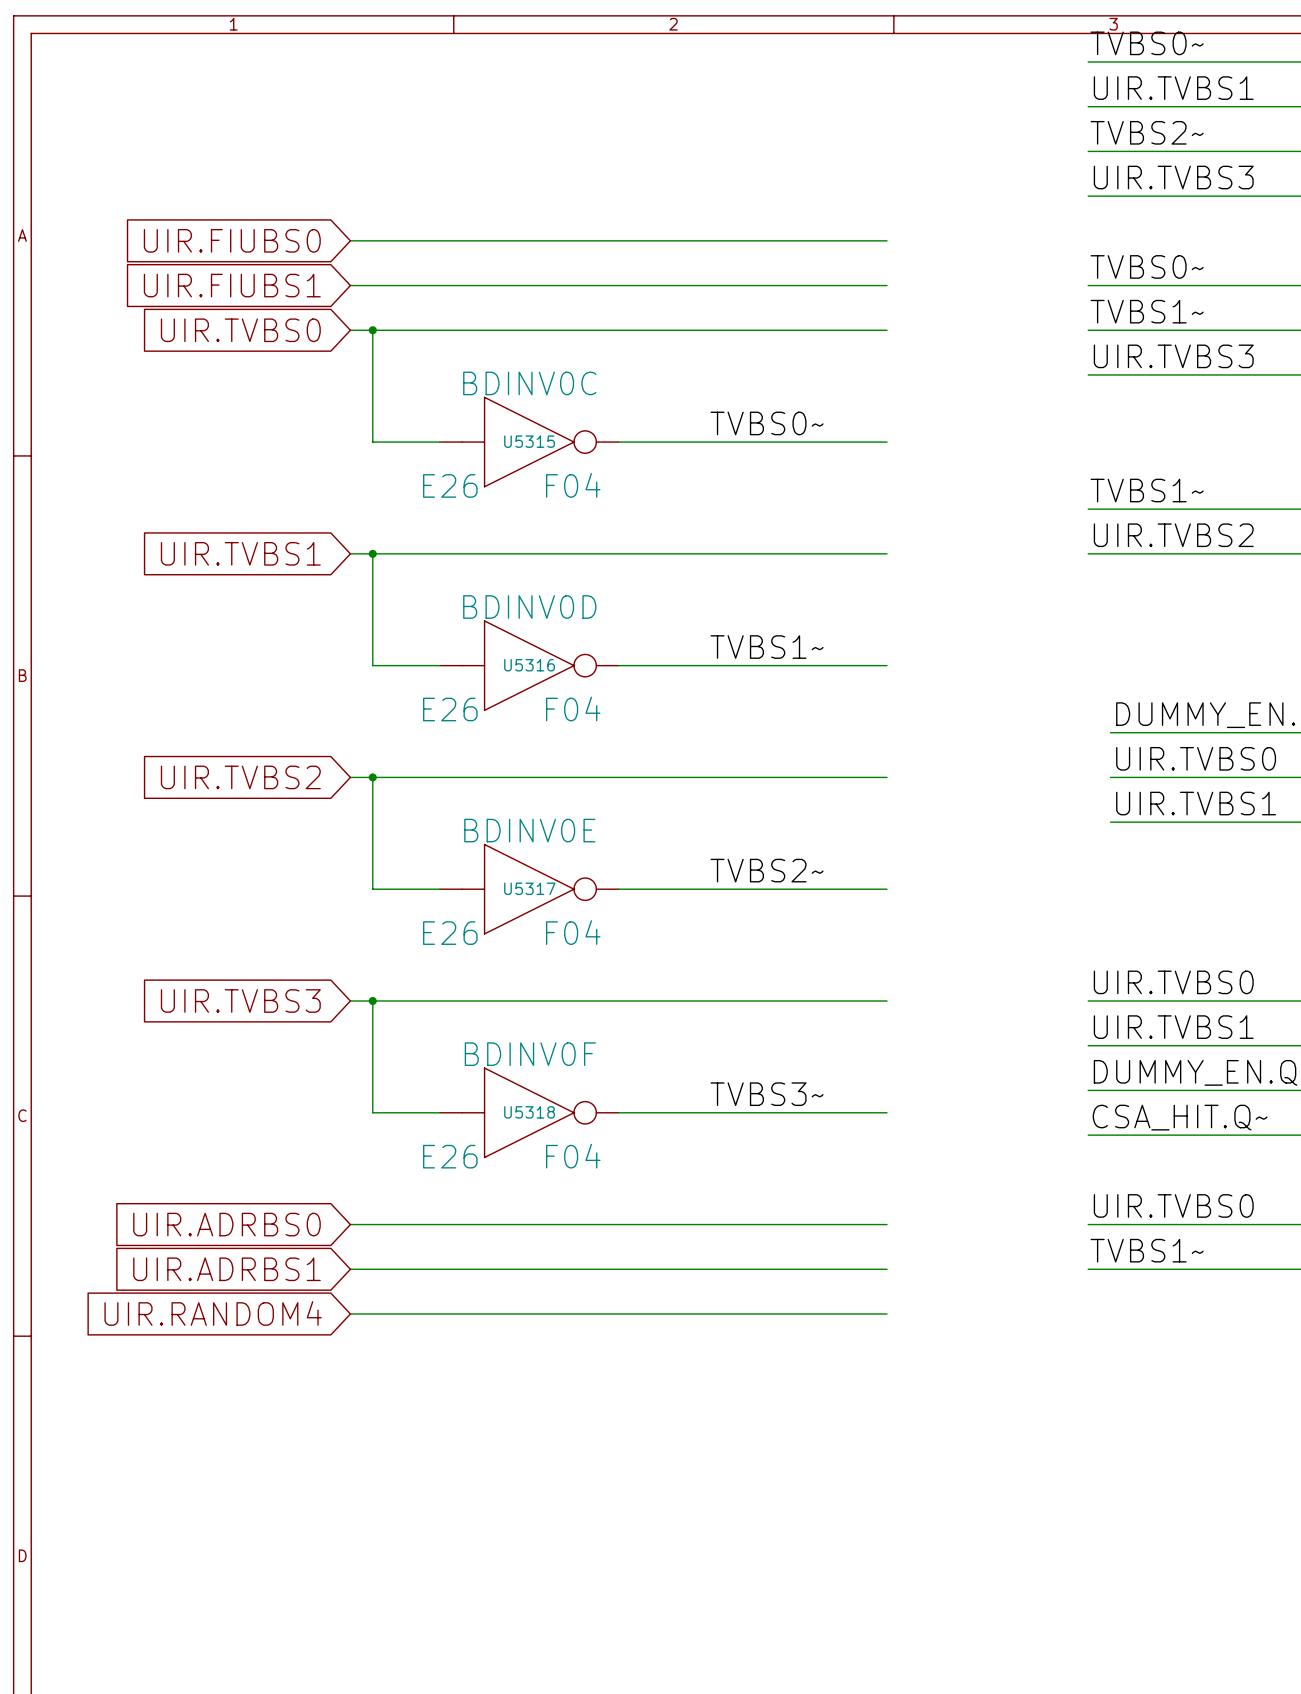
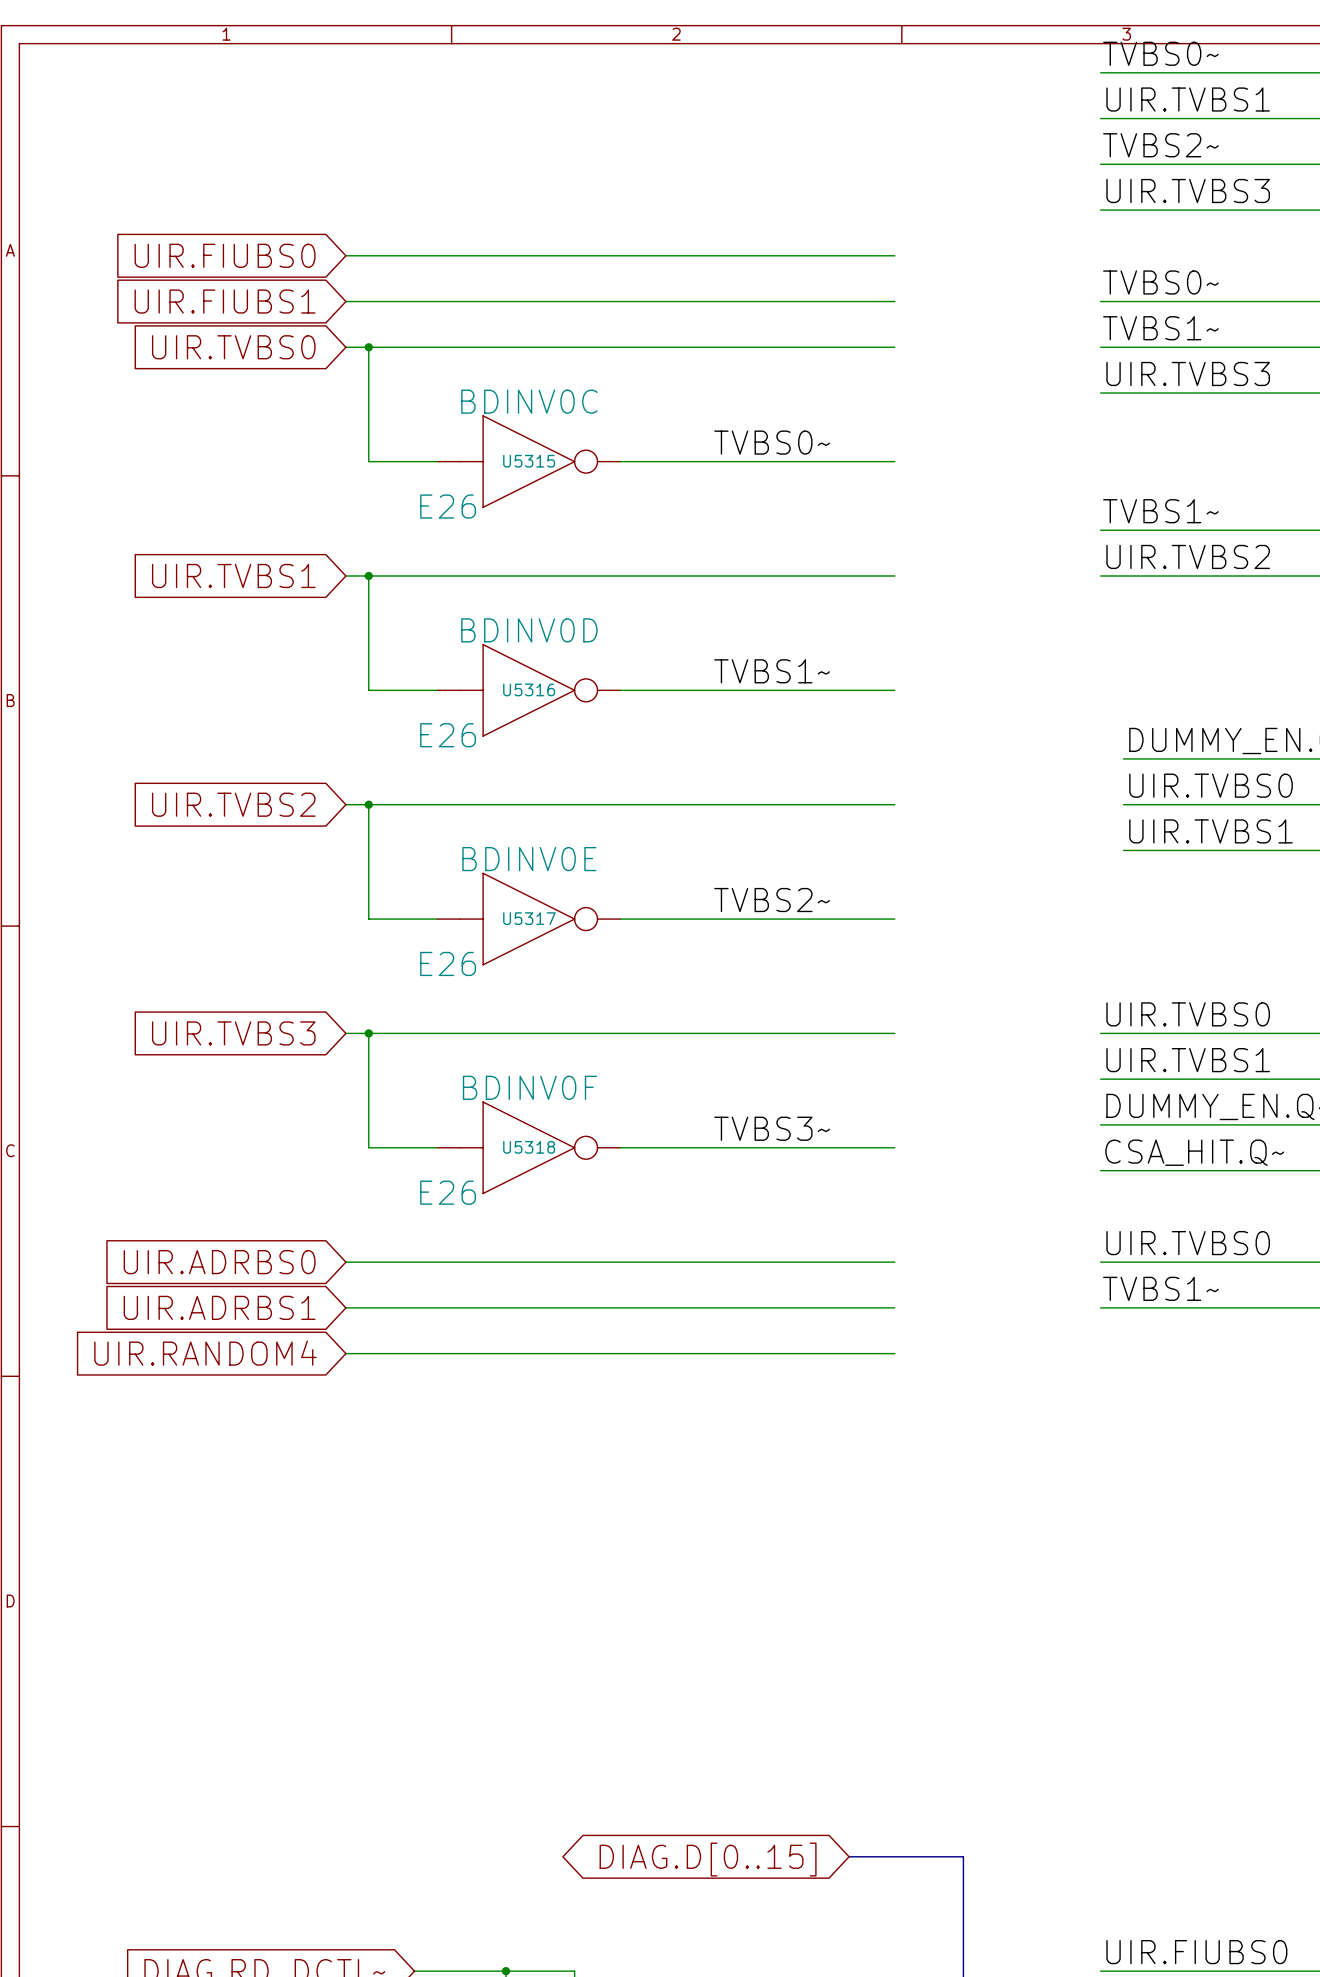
U5315 value: F04 (573, 485) -> none
U5316 value: F04 (573, 708) -> none
U5317 value: F04 (573, 932) -> none
U5318 value: F04 (573, 1156) -> none

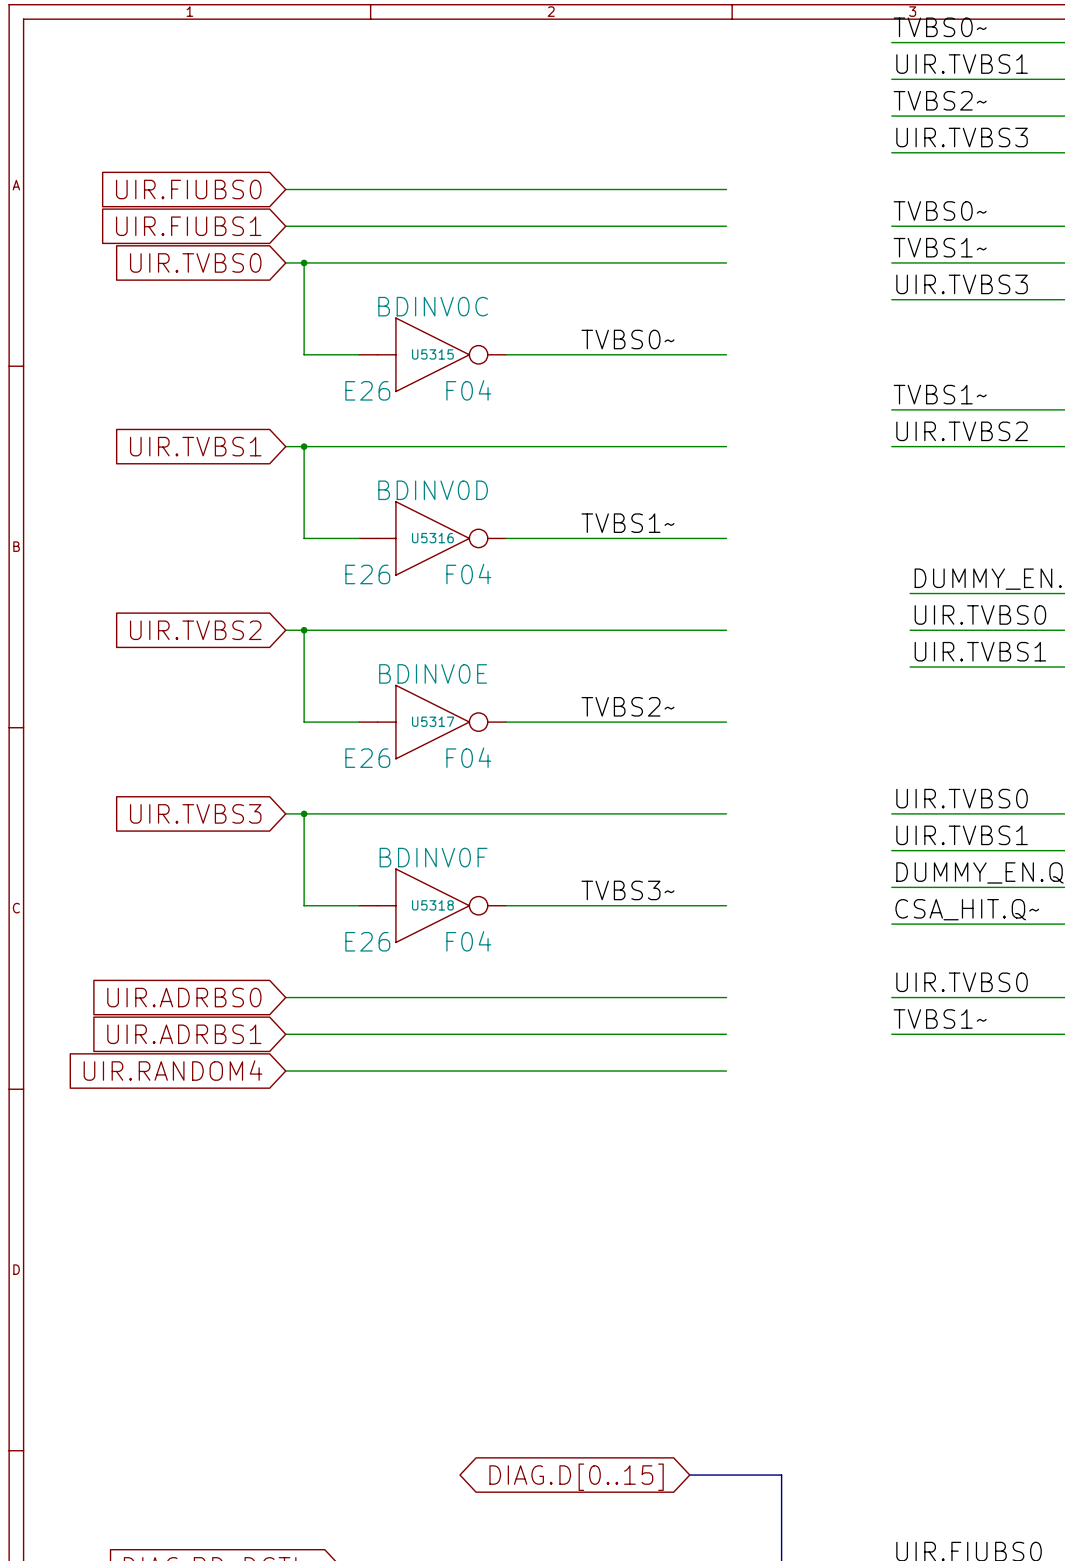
U5315 value: none -> F04 (468, 390)
U5316 value: none -> F04 (468, 574)
U5317 value: none -> F04 (468, 757)
U5318 value: none -> F04 (468, 941)

